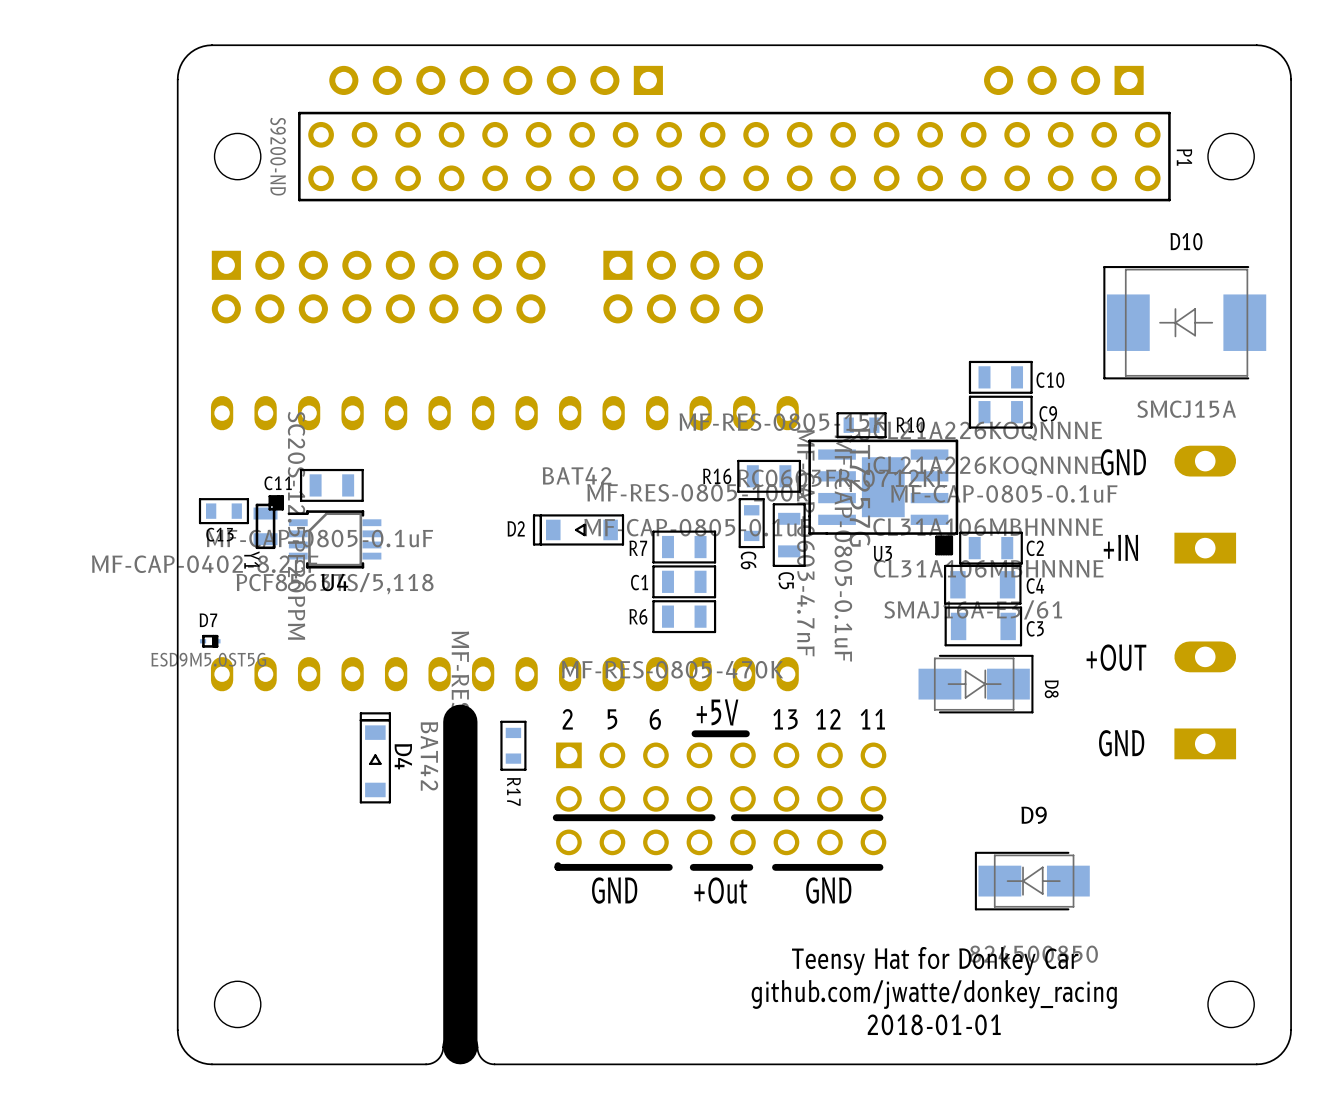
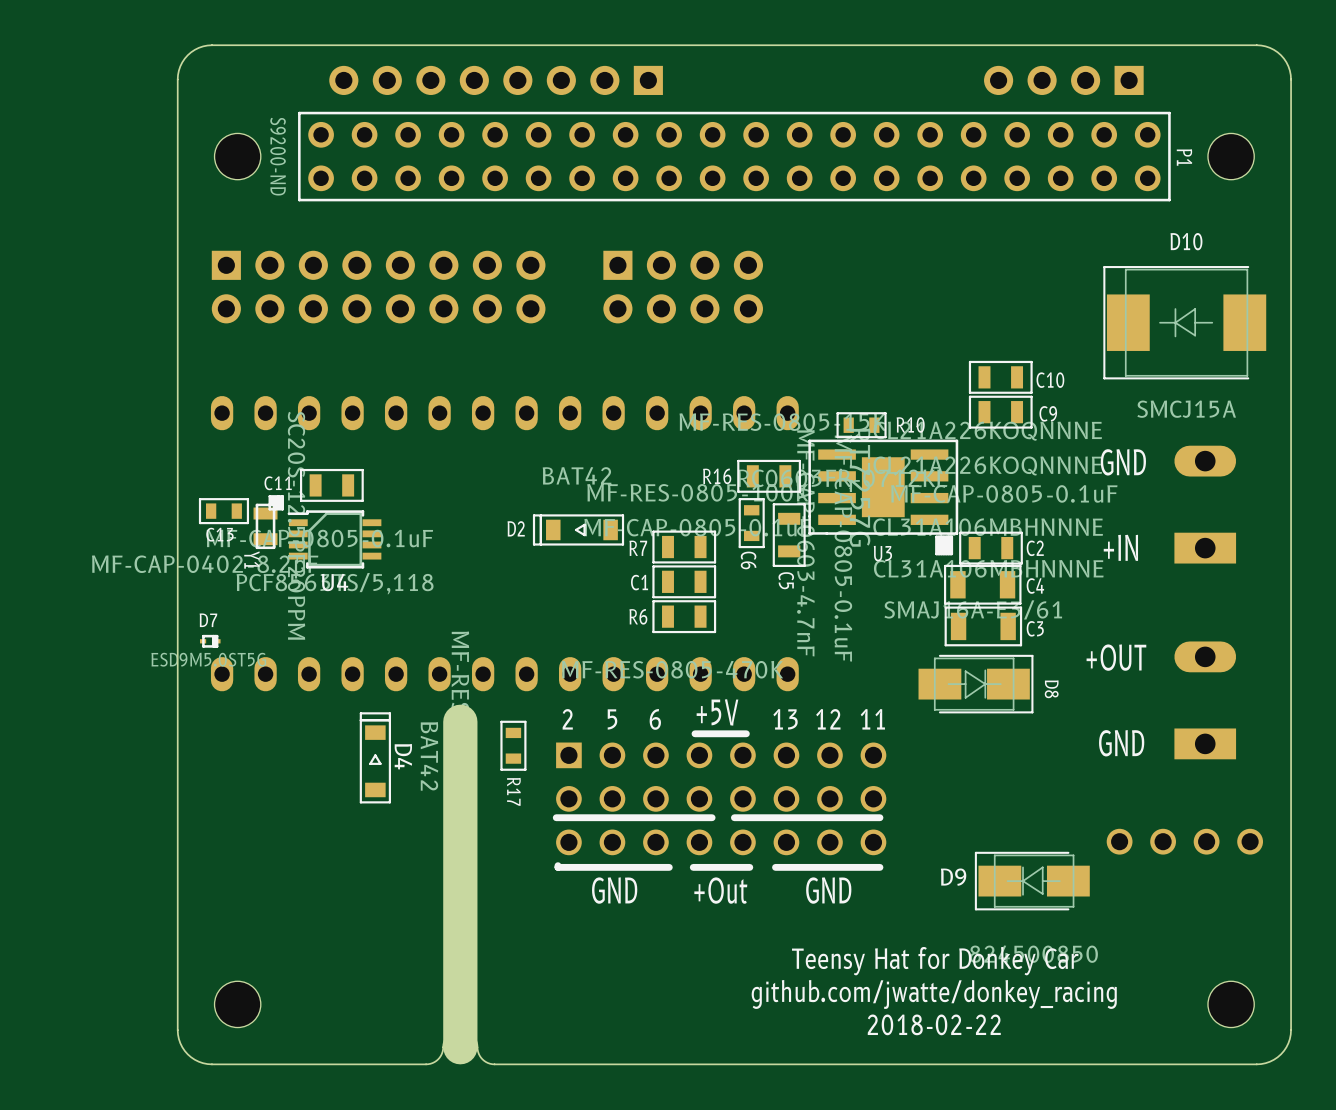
D9 name position: D9 (1034, 815) -> D9 (953, 877)
part: none -> (1184, 841)
text: 2018-01-01 (934, 1024) -> 2018-02-22 (934, 1024)

